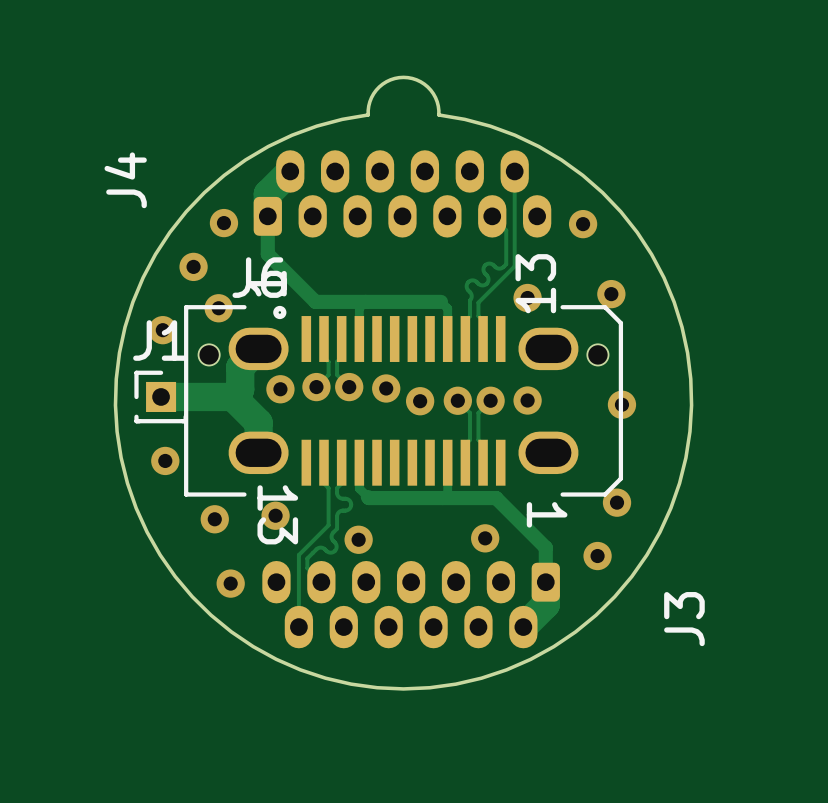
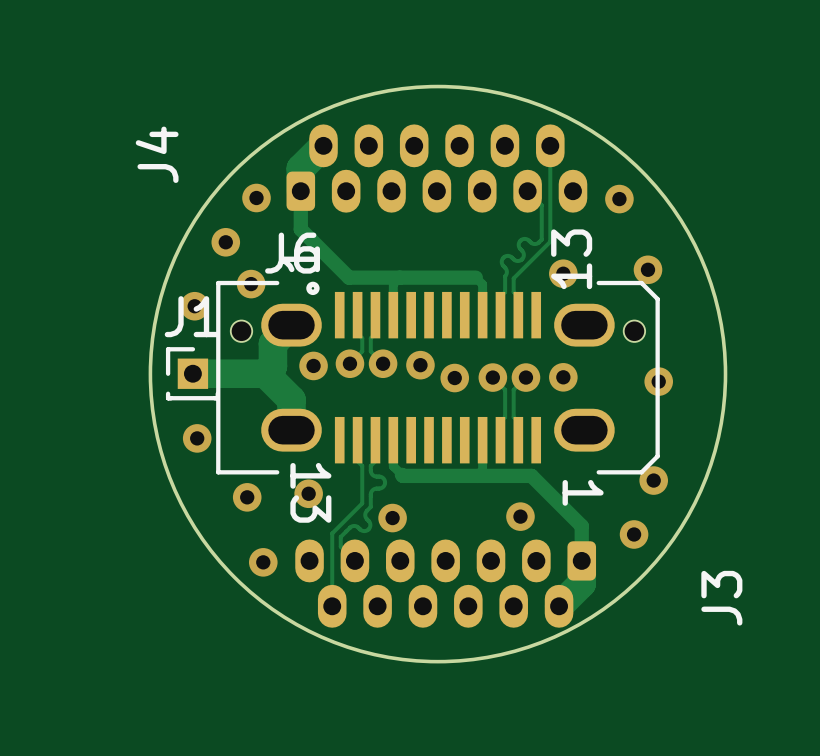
round board edge: none -> [148, 84, 728, 664]
board edge: (368, 114) (371, 97) (379, 86) (394, 78) (412, 78) (424, 84) (430, 90) (437, 101) (438, 114) (490, 126) (515, 135) (538, 146) (582, 175) (620, 211) (651, 254) (663, 277) (682, 327) (690, 379) (689, 431) (679, 483) (670, 508) (646, 555) (614, 596) (575, 631) (530, 659) (481, 678) (429, 687) (377, 687) (325, 678) (276, 659) (231, 631) (192, 596) (175, 576) (147, 532) (127, 483) (117, 431) (116, 379) (125, 327) (143, 277) (155, 254) (186, 211) (224, 175) (268, 146) (316, 126) (368, 114) -> none

